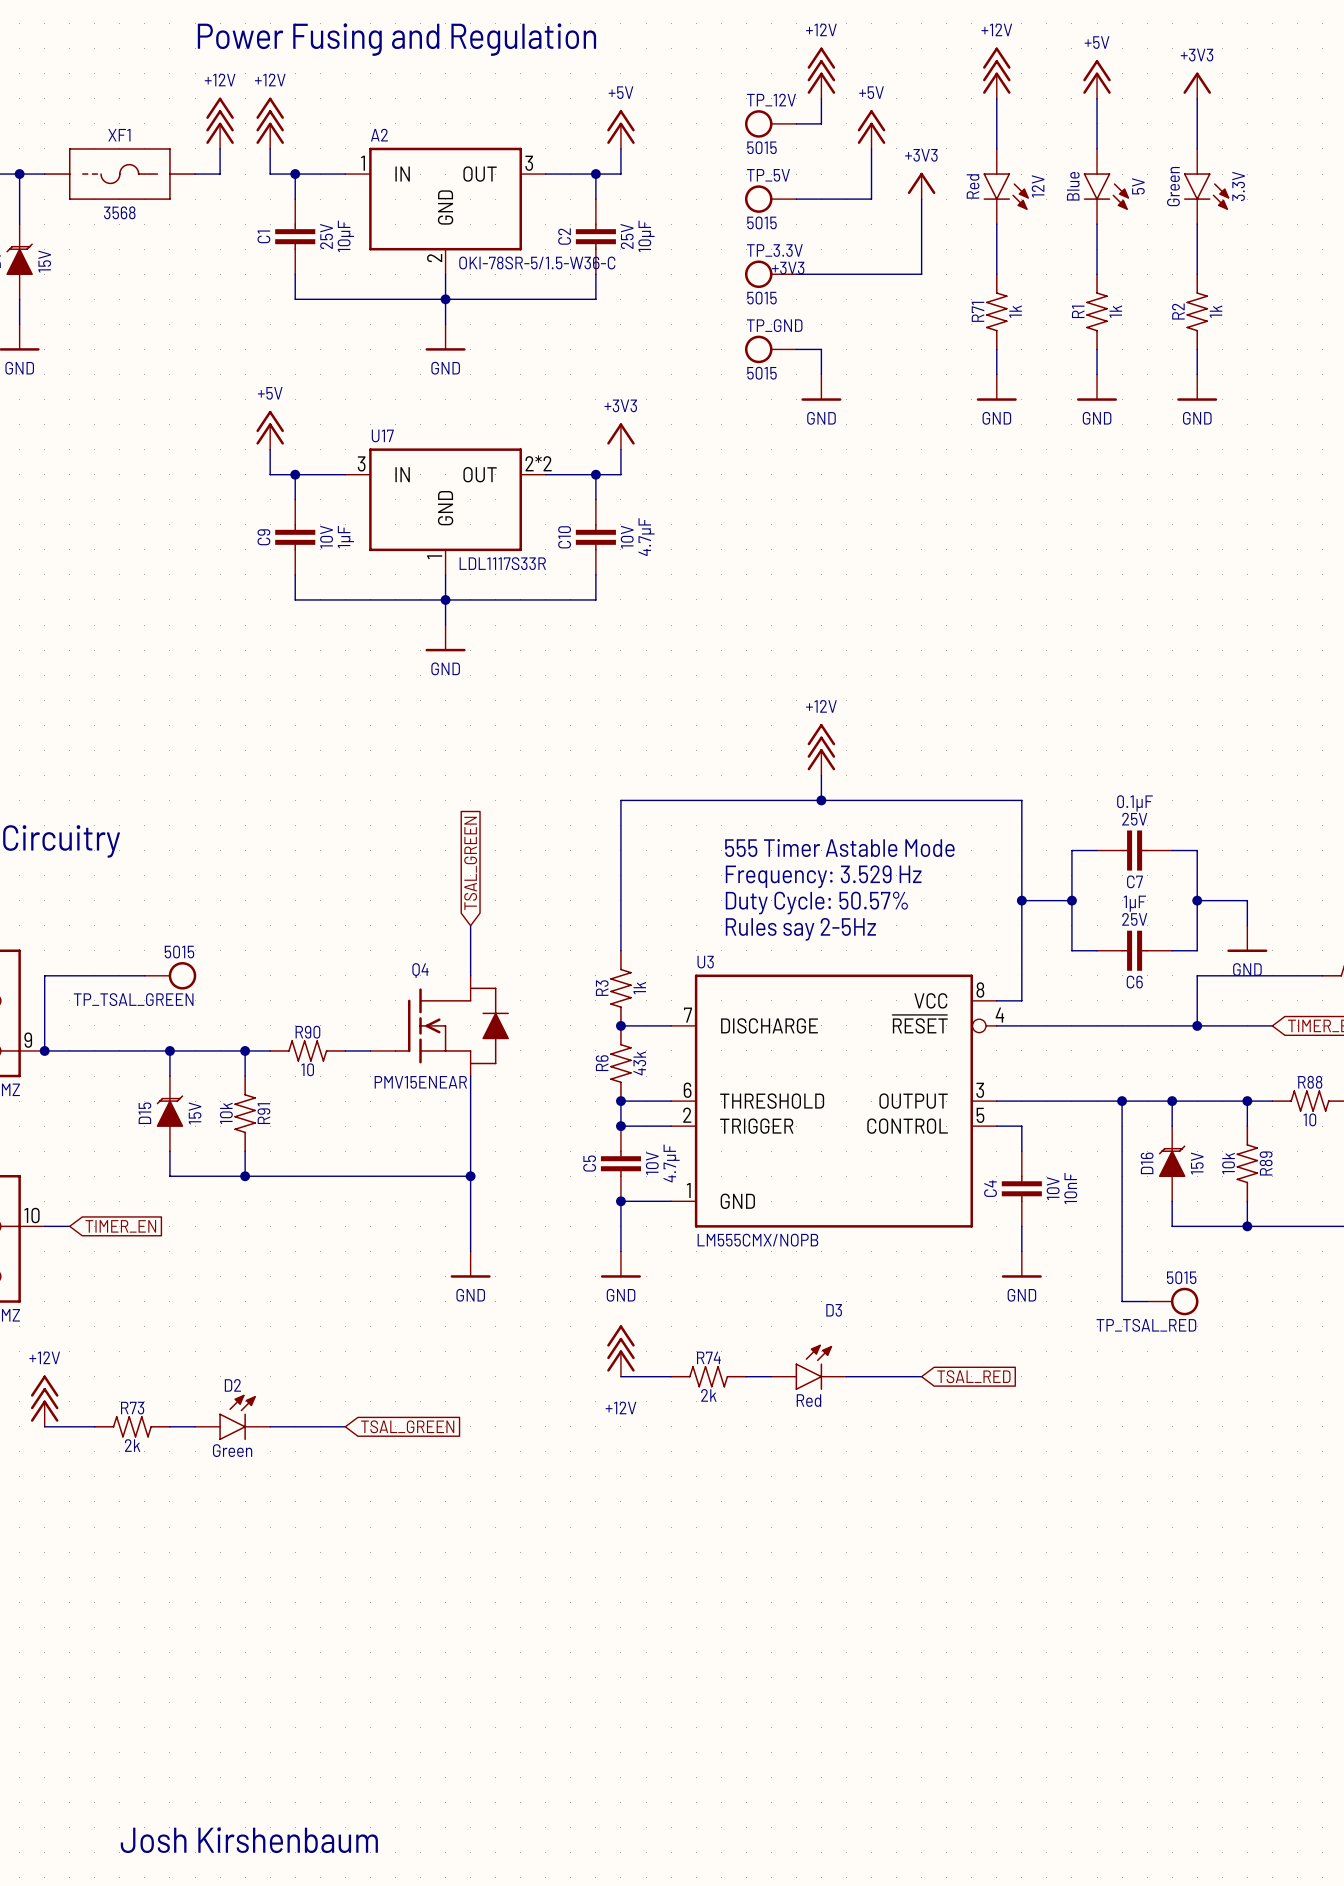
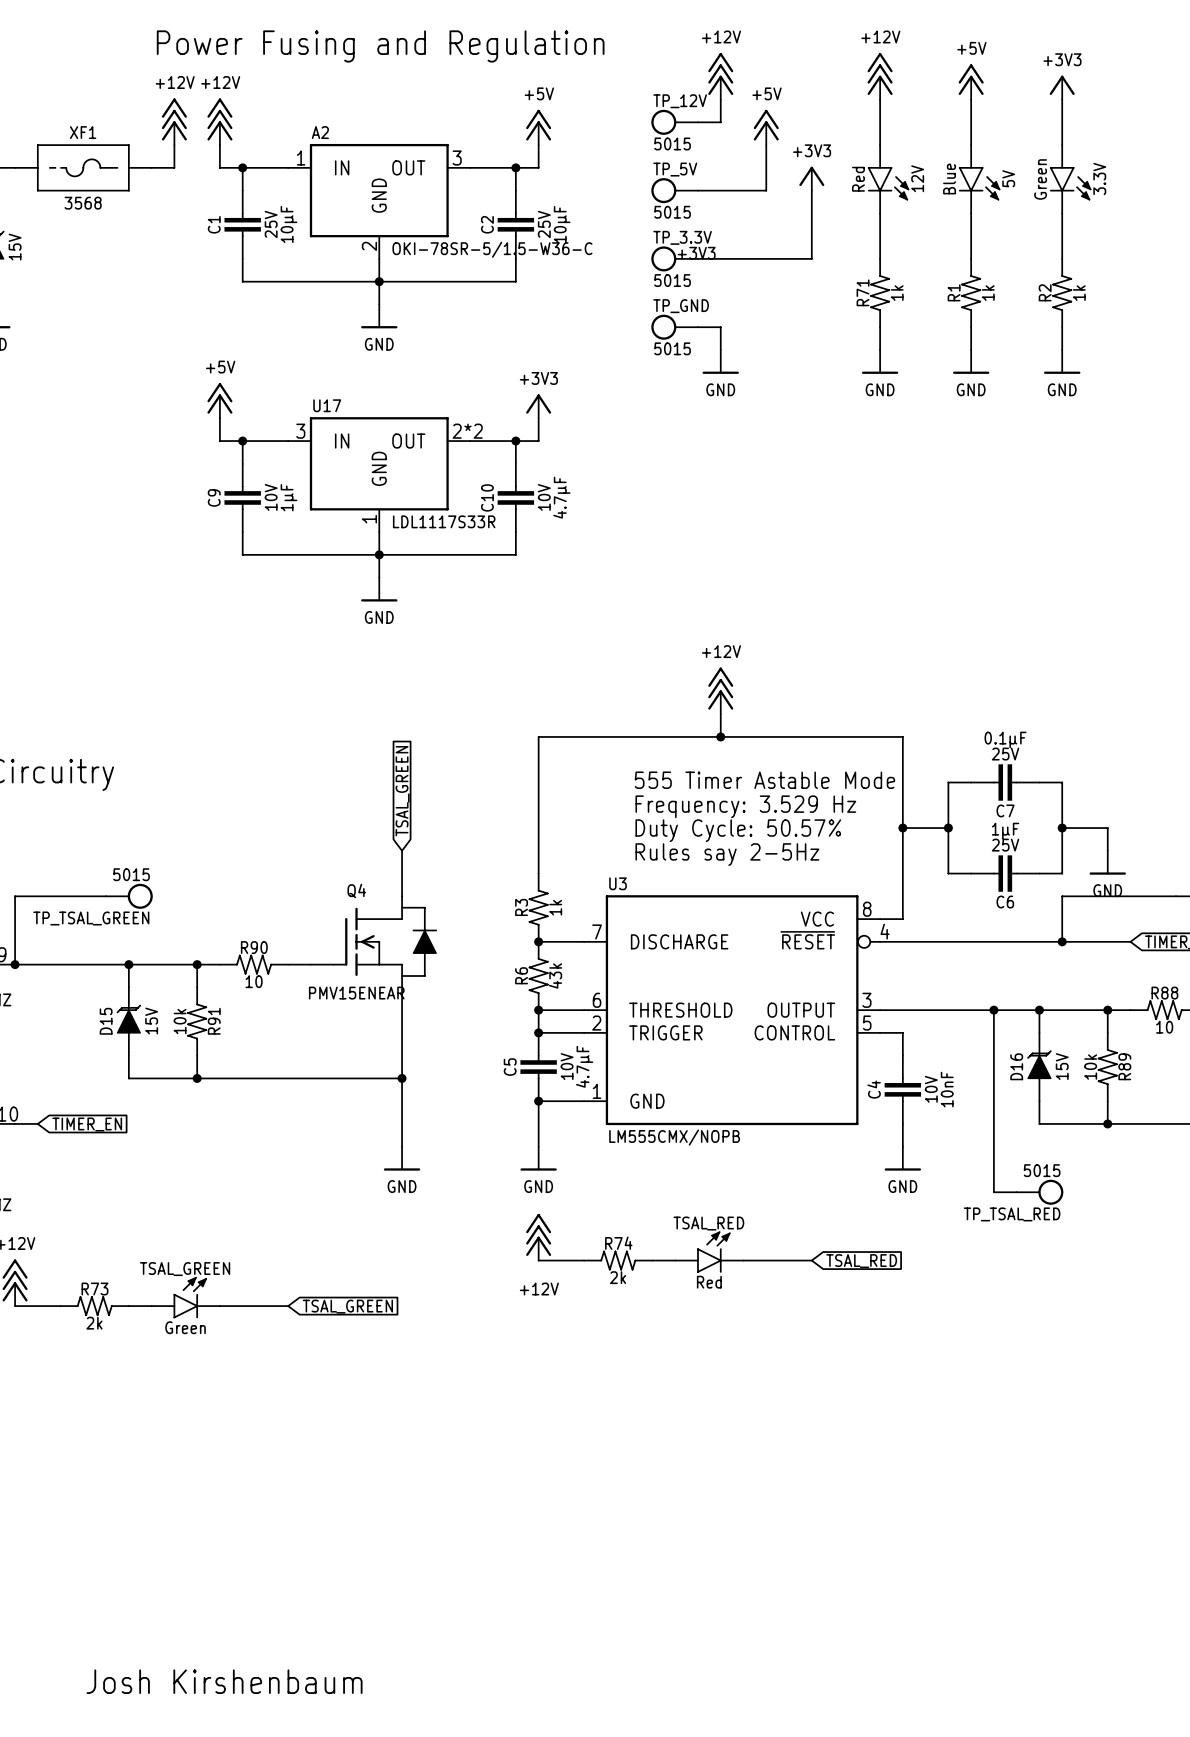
D3 name: D3 (834, 1310) -> TSAL_RED (708, 1223)
D2 name: D2 (232, 1385) -> TSAL_GREEN (185, 1269)

